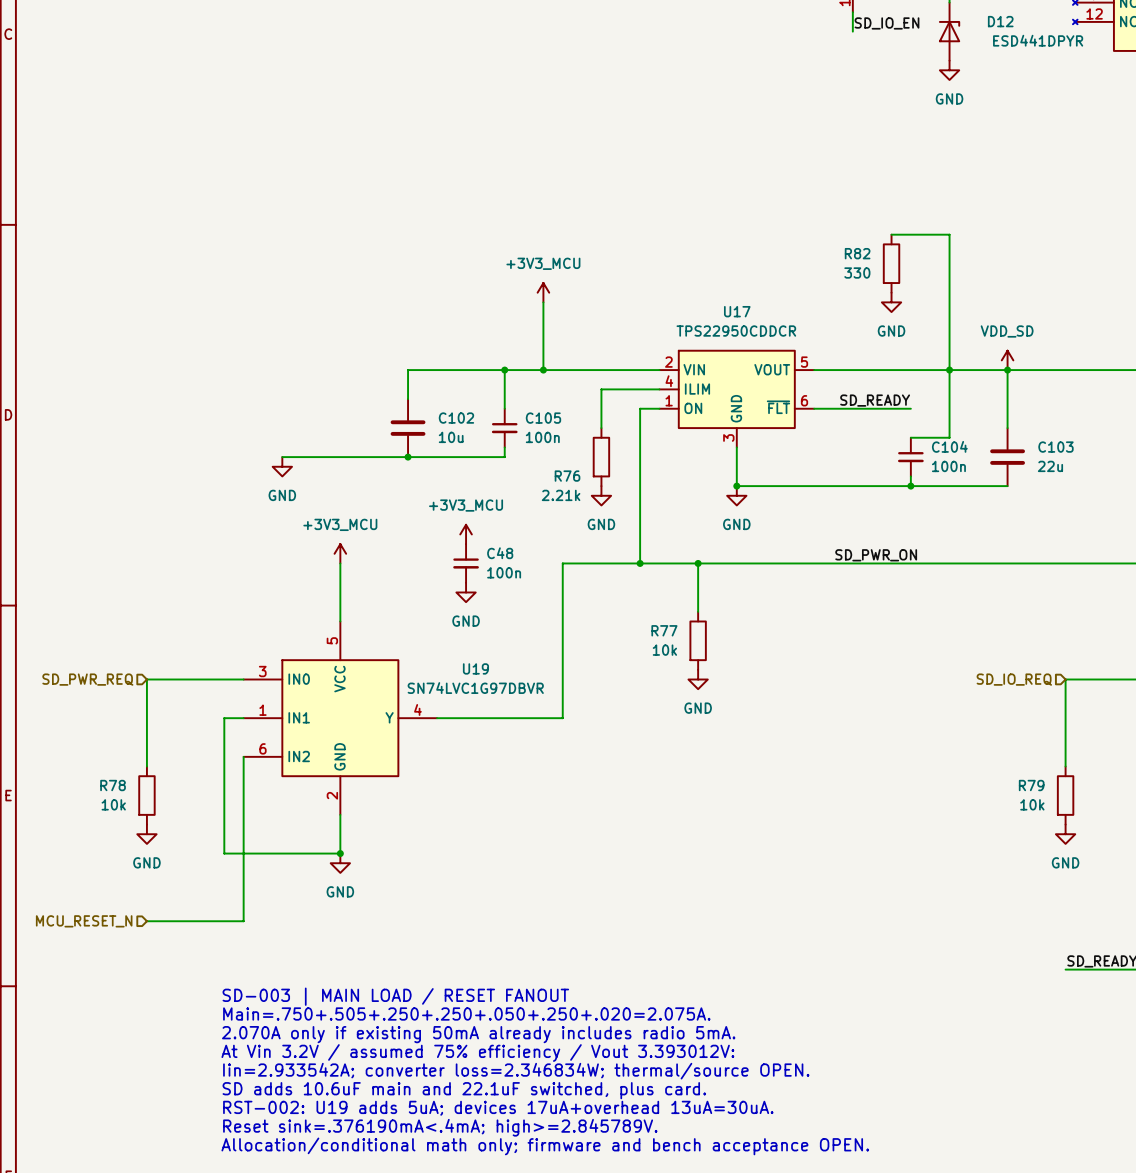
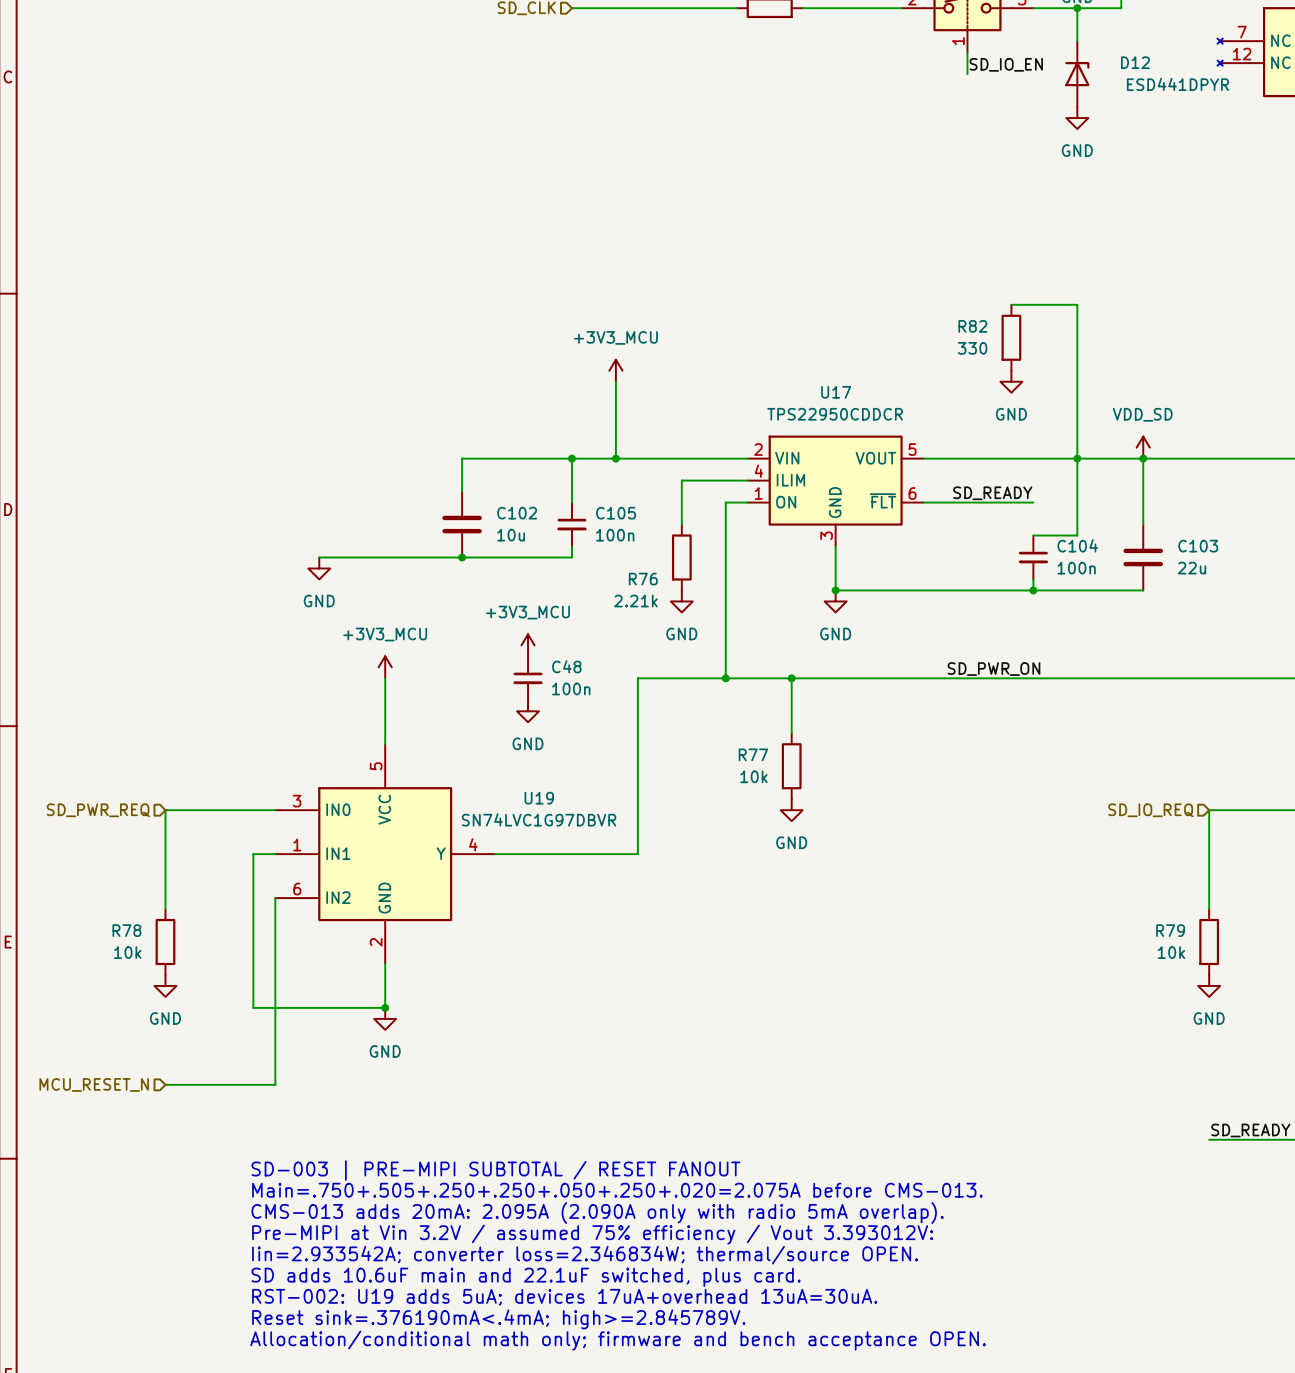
text: SD-003 | MAIN LOAD / RESET FANOUT (395, 996) -> SD-003 | PRE-MIPI SUBTOTAL / RESET FANOUT (495, 1170)
text: Main=.750+.505+.250+.250+.050+.250+.020=2.075A. (466, 1014) -> Main=.750+.505+.250+.250+.050+.250+.020=2.075A before CMS-013. (617, 1190)
text: 2.070A only if existing 50mA already includes radio 5mA. (478, 1034) -> CMS-013 adds 20mA: 2.095A (2.090A only with radio 5mA overlap). (597, 1213)
text: At Vin 3.2V / assumed 75% efficiency / Vout 3.393012V: (477, 1053) -> Pre-MIPI at Vin 3.2V / assumed 75% efficiency / Vout 3.393012V: (592, 1234)

